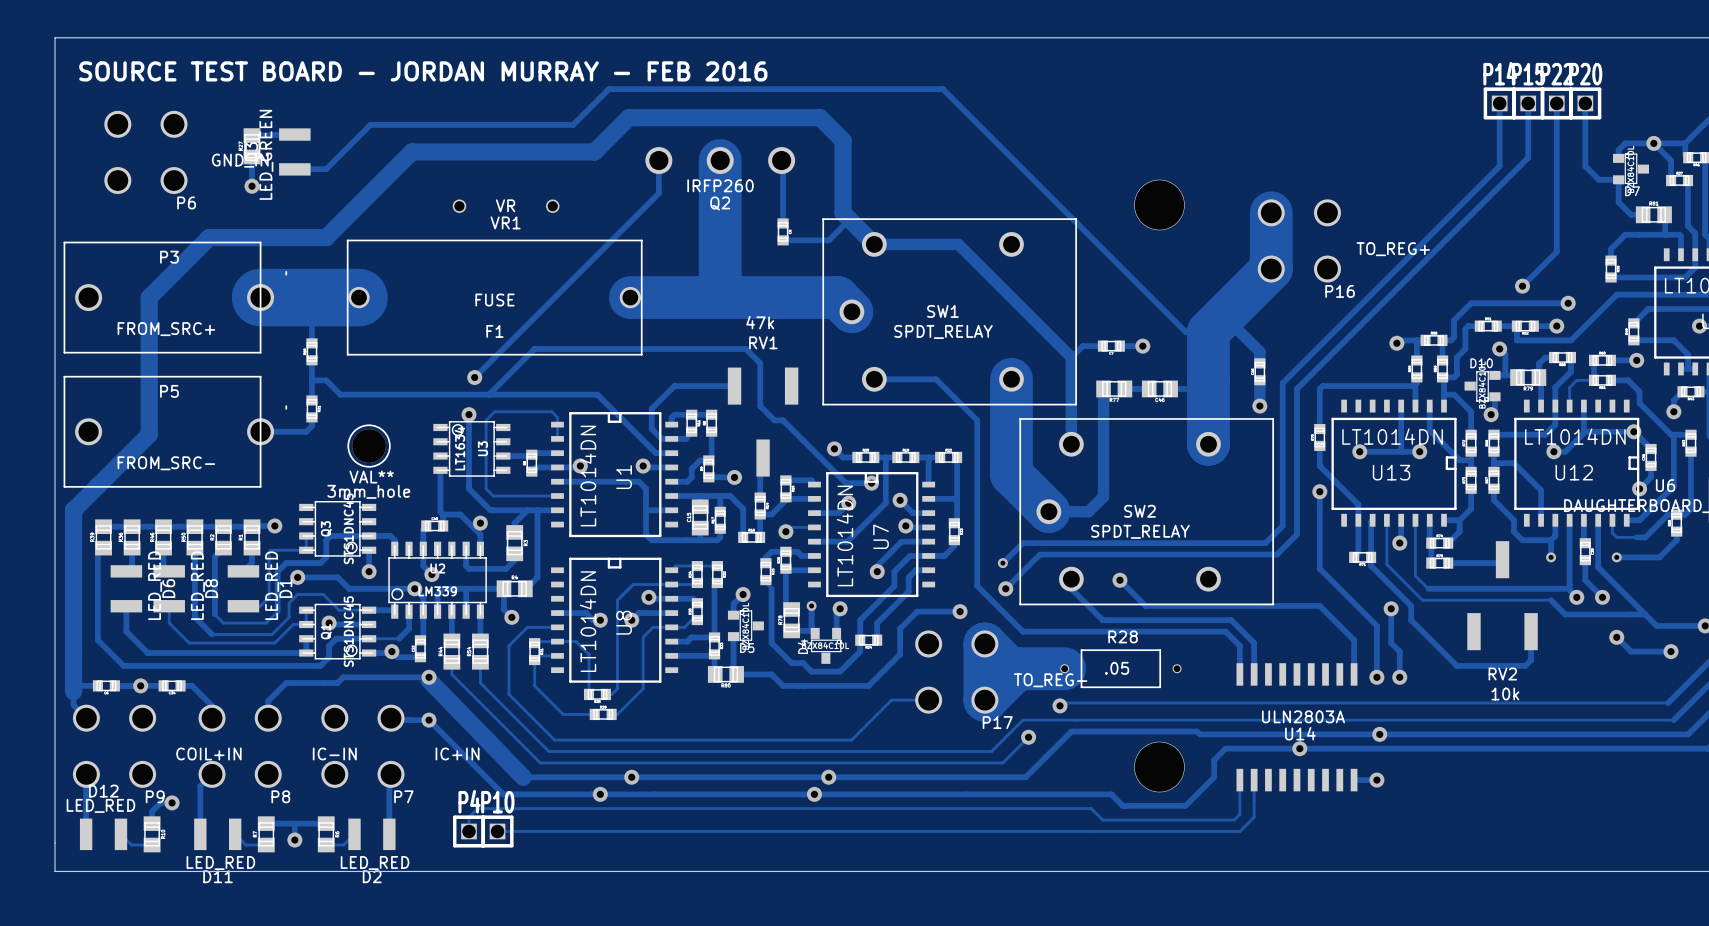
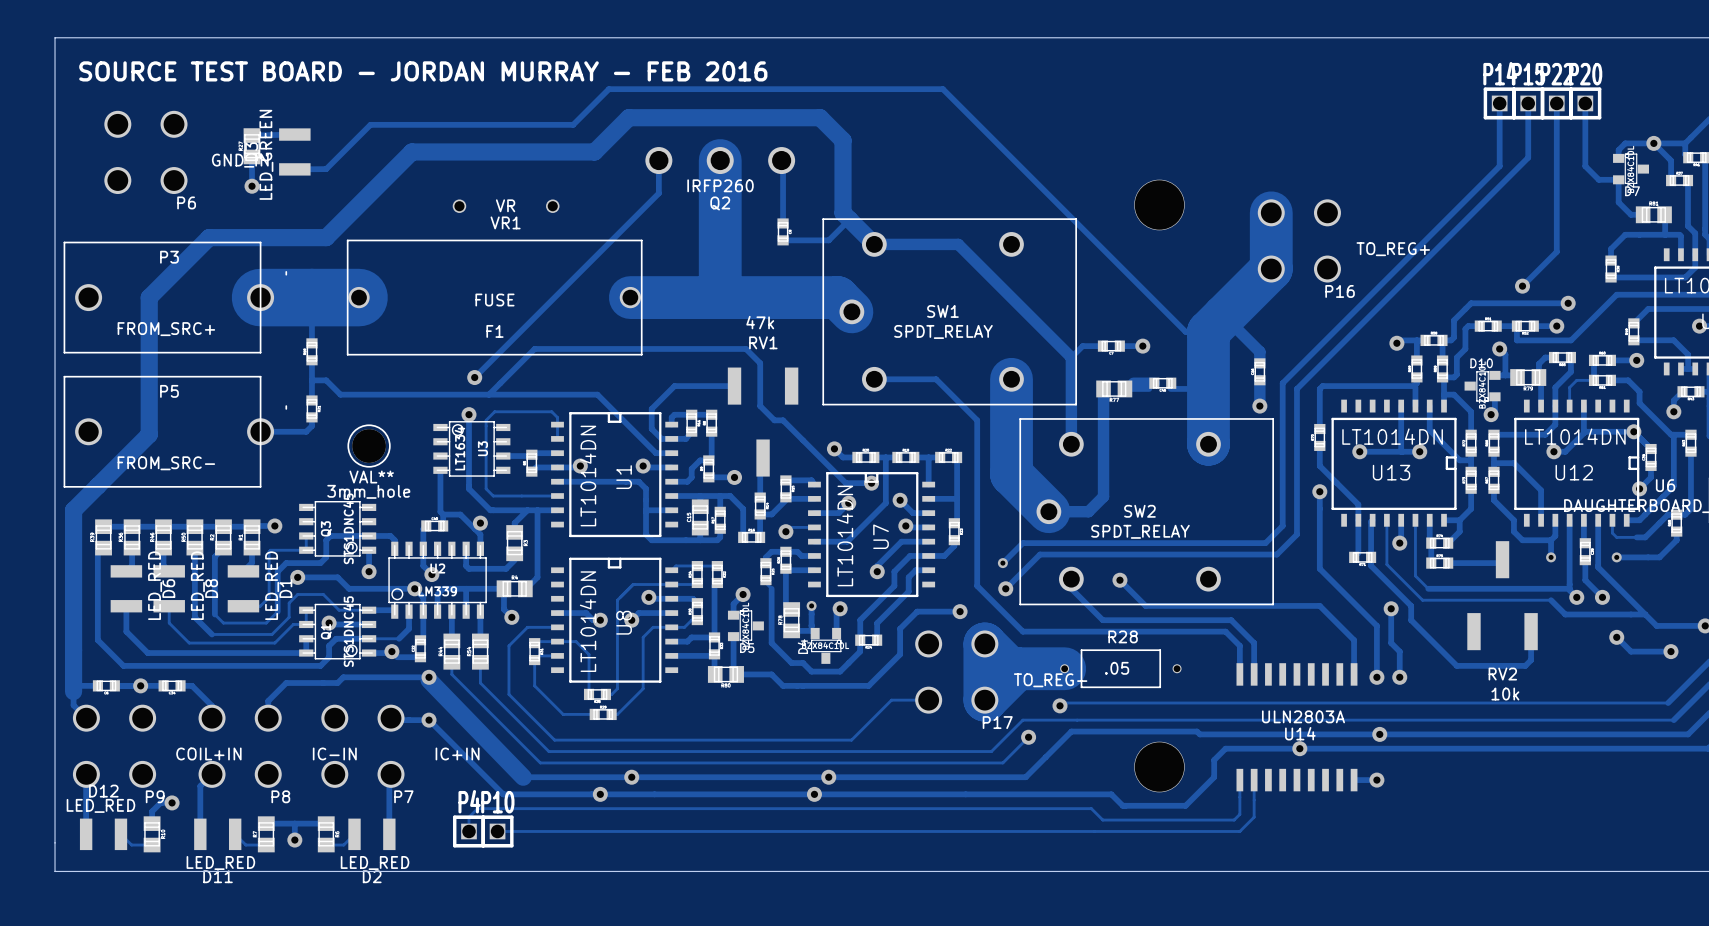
part footprint: [1141, 380, 1178, 398] -> [1149, 377, 1177, 389]
track: none -> (1133, 383) (1154, 383)

